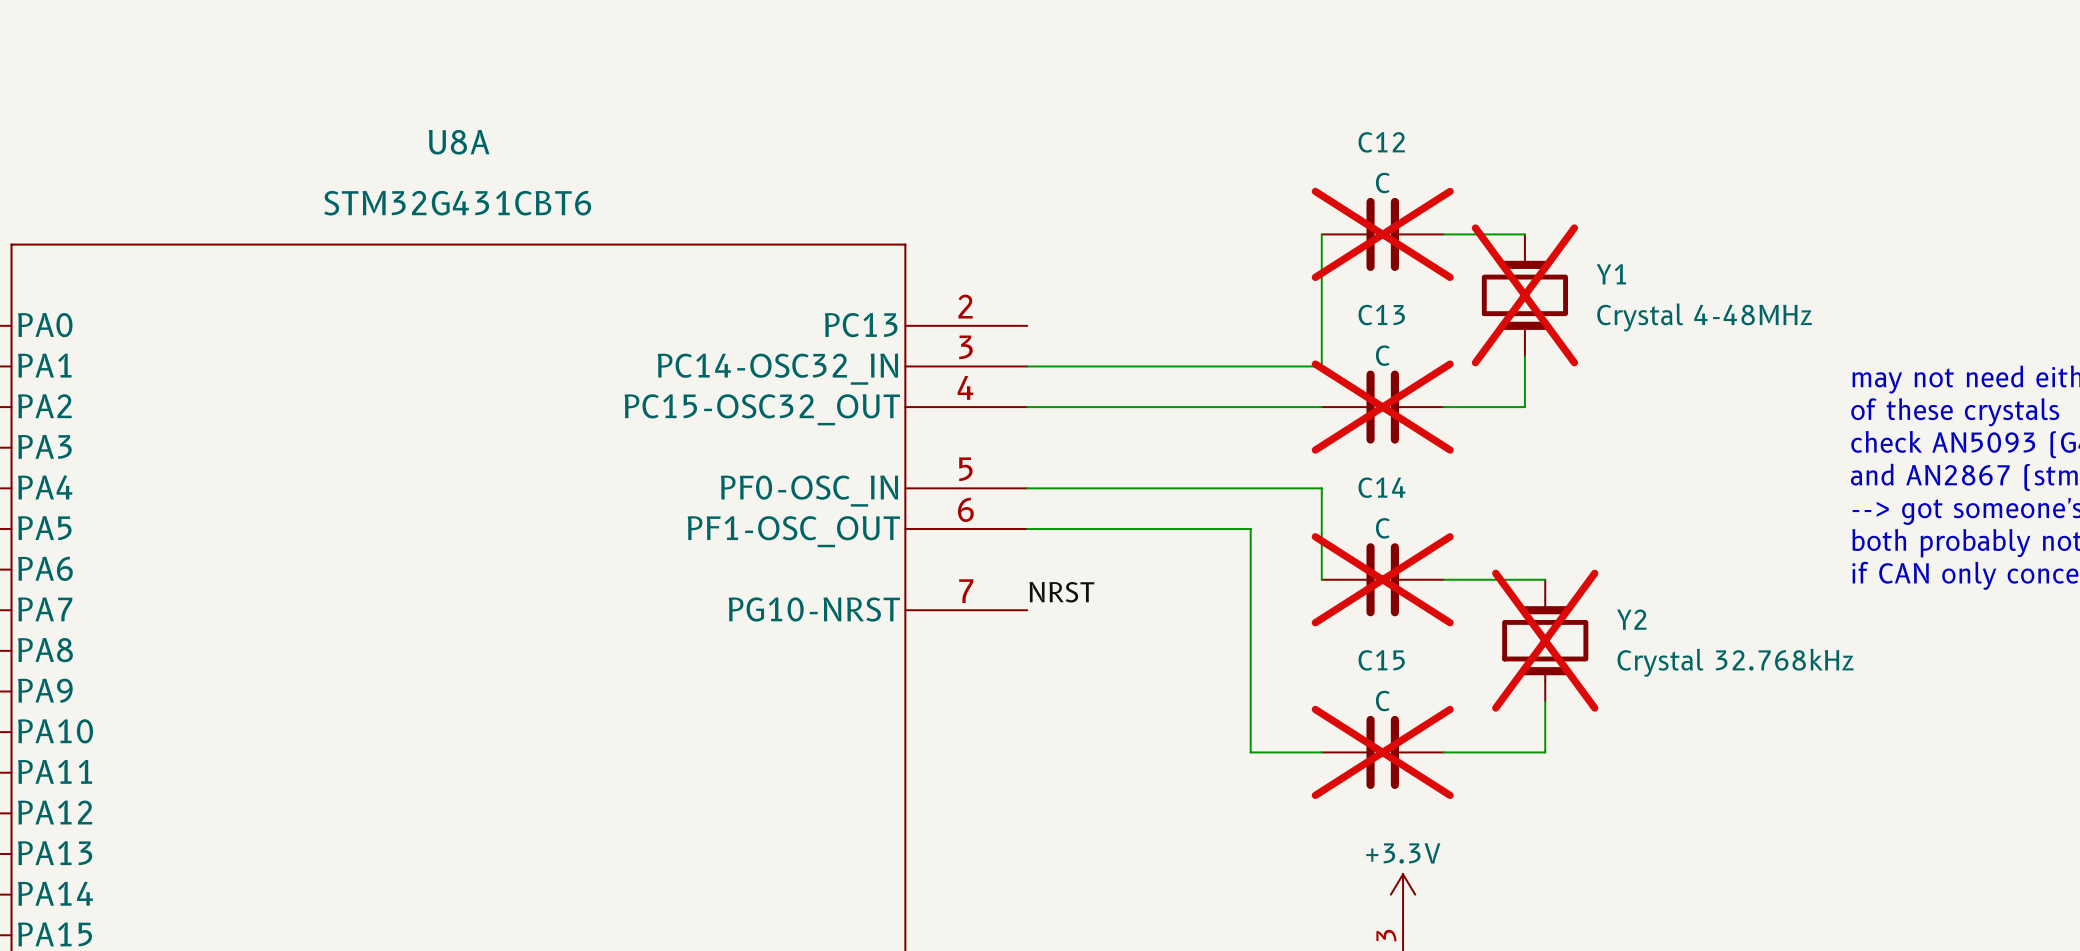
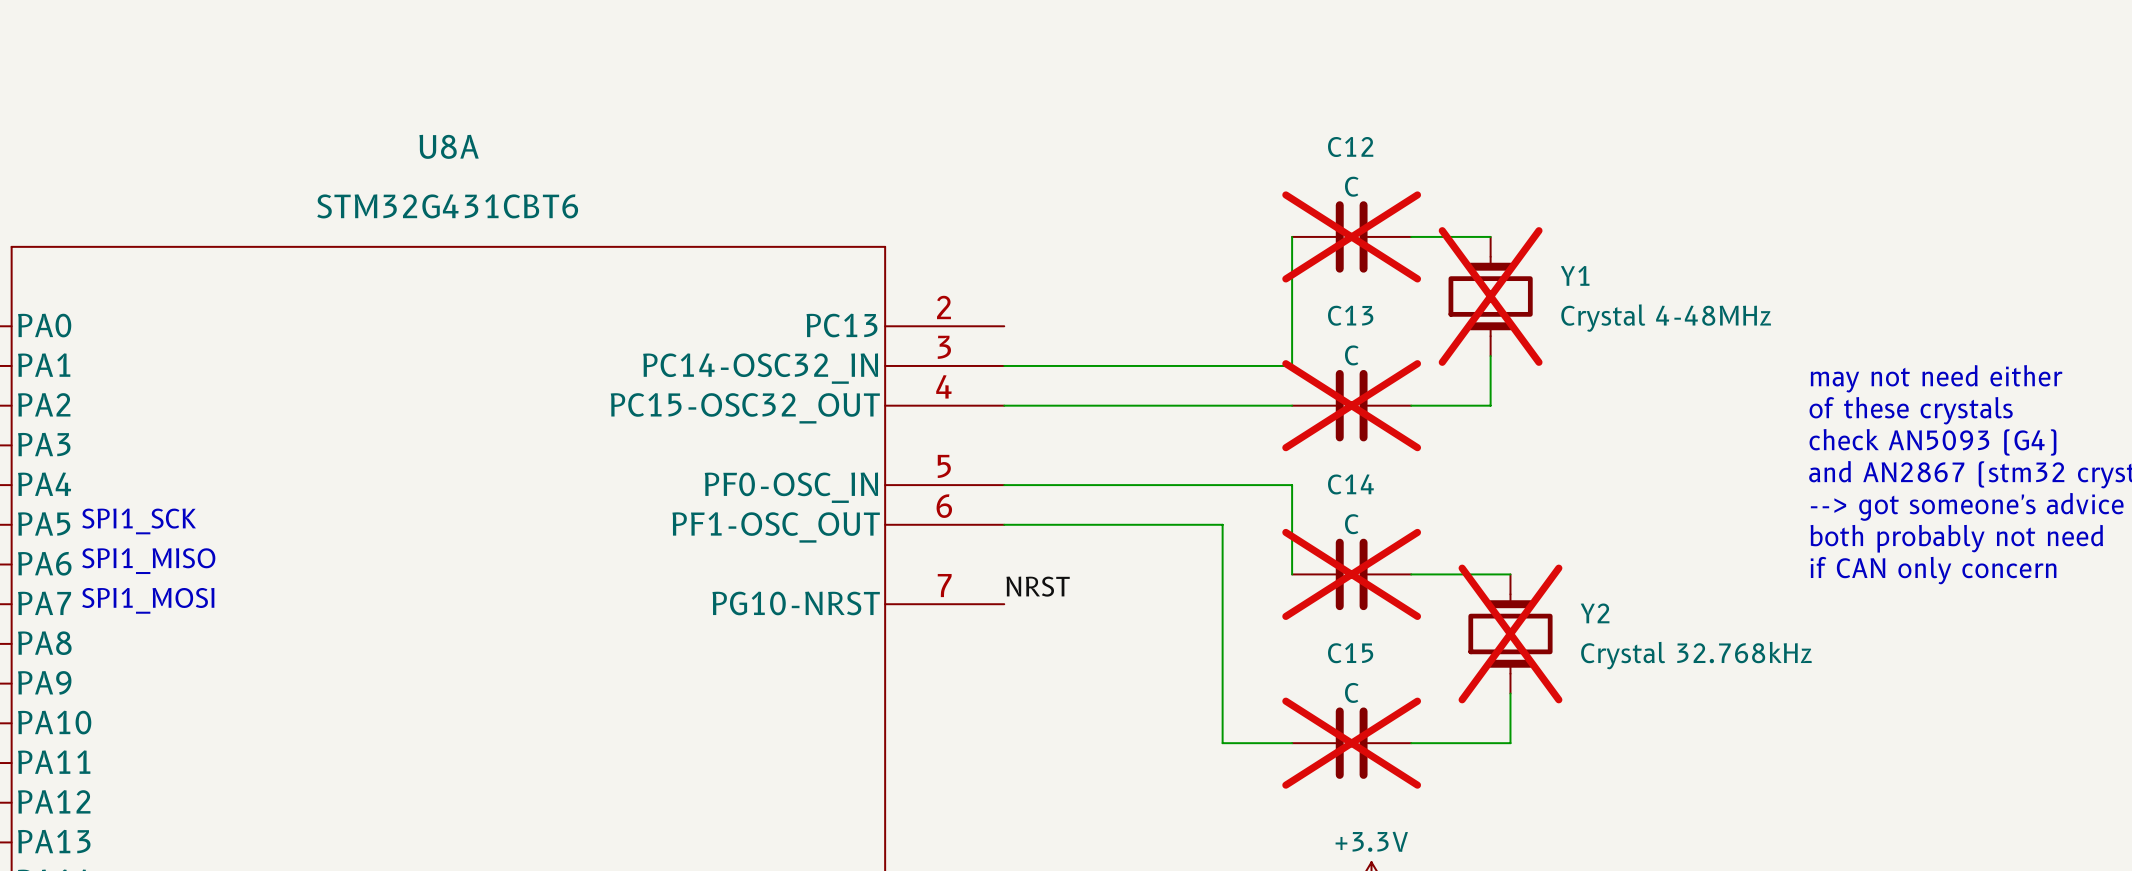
text: none -> SPI1_SCK (139, 521)
text: none -> SPI1_MISO (148, 561)
text: none -> SPI1_MOSI (148, 600)

